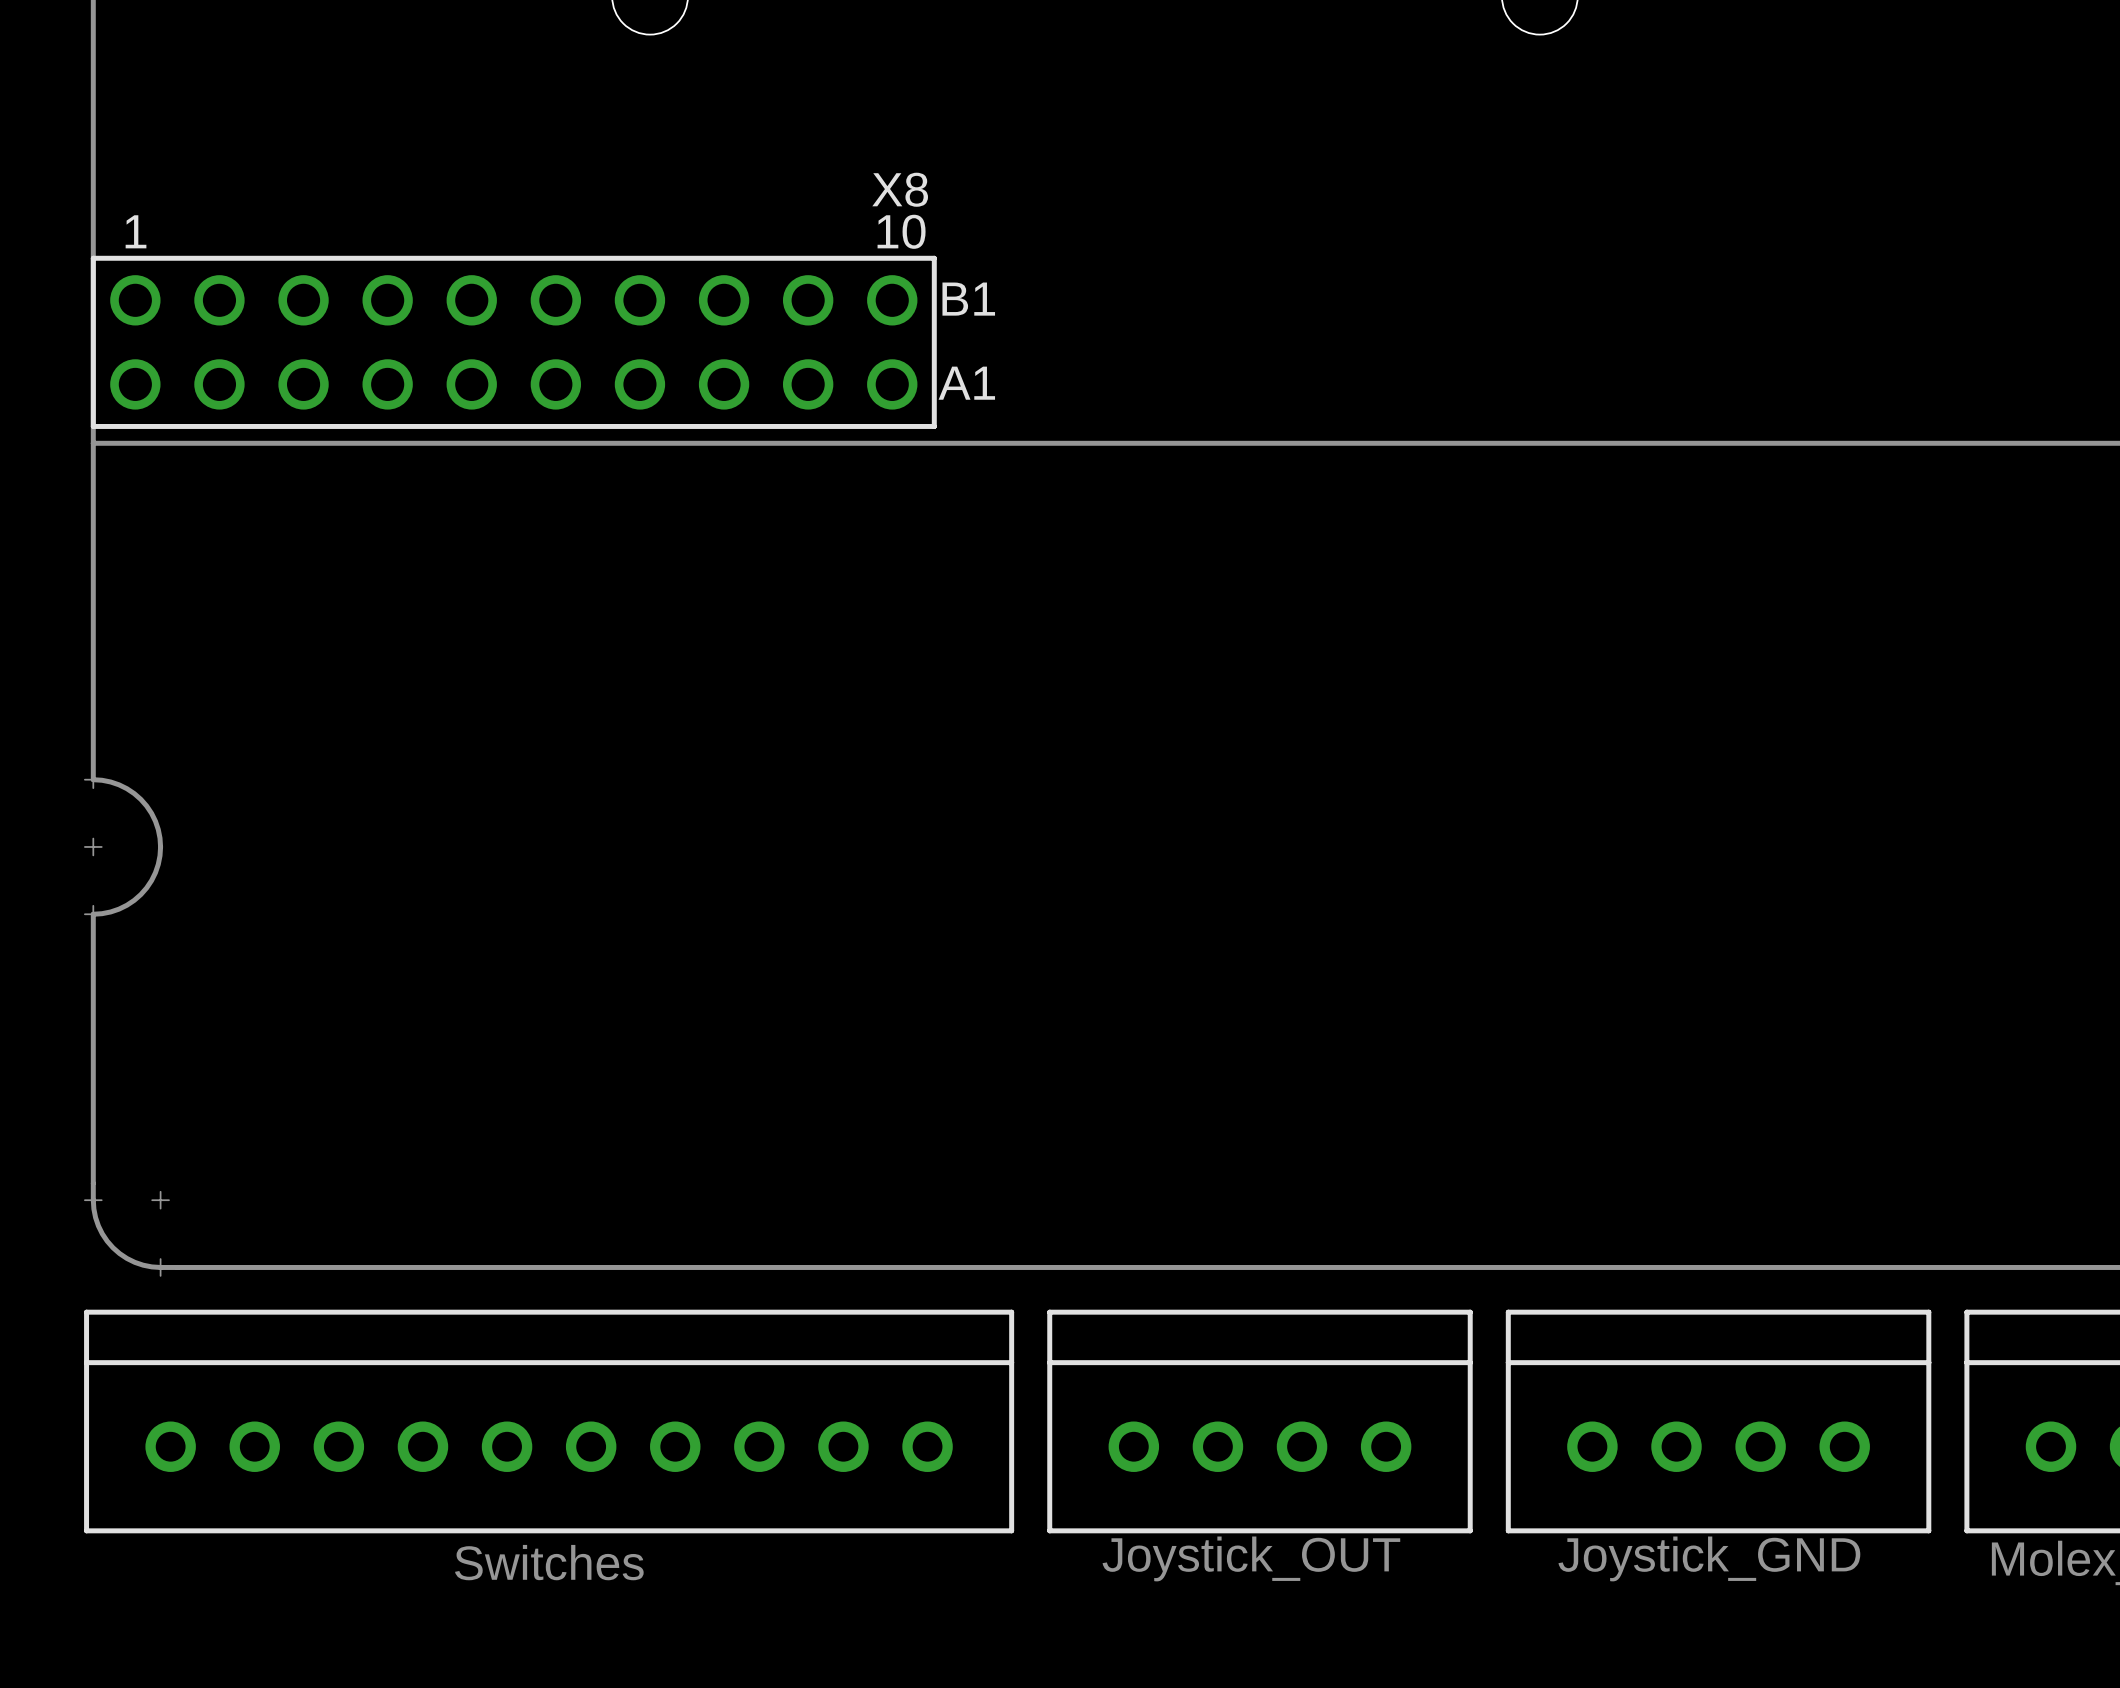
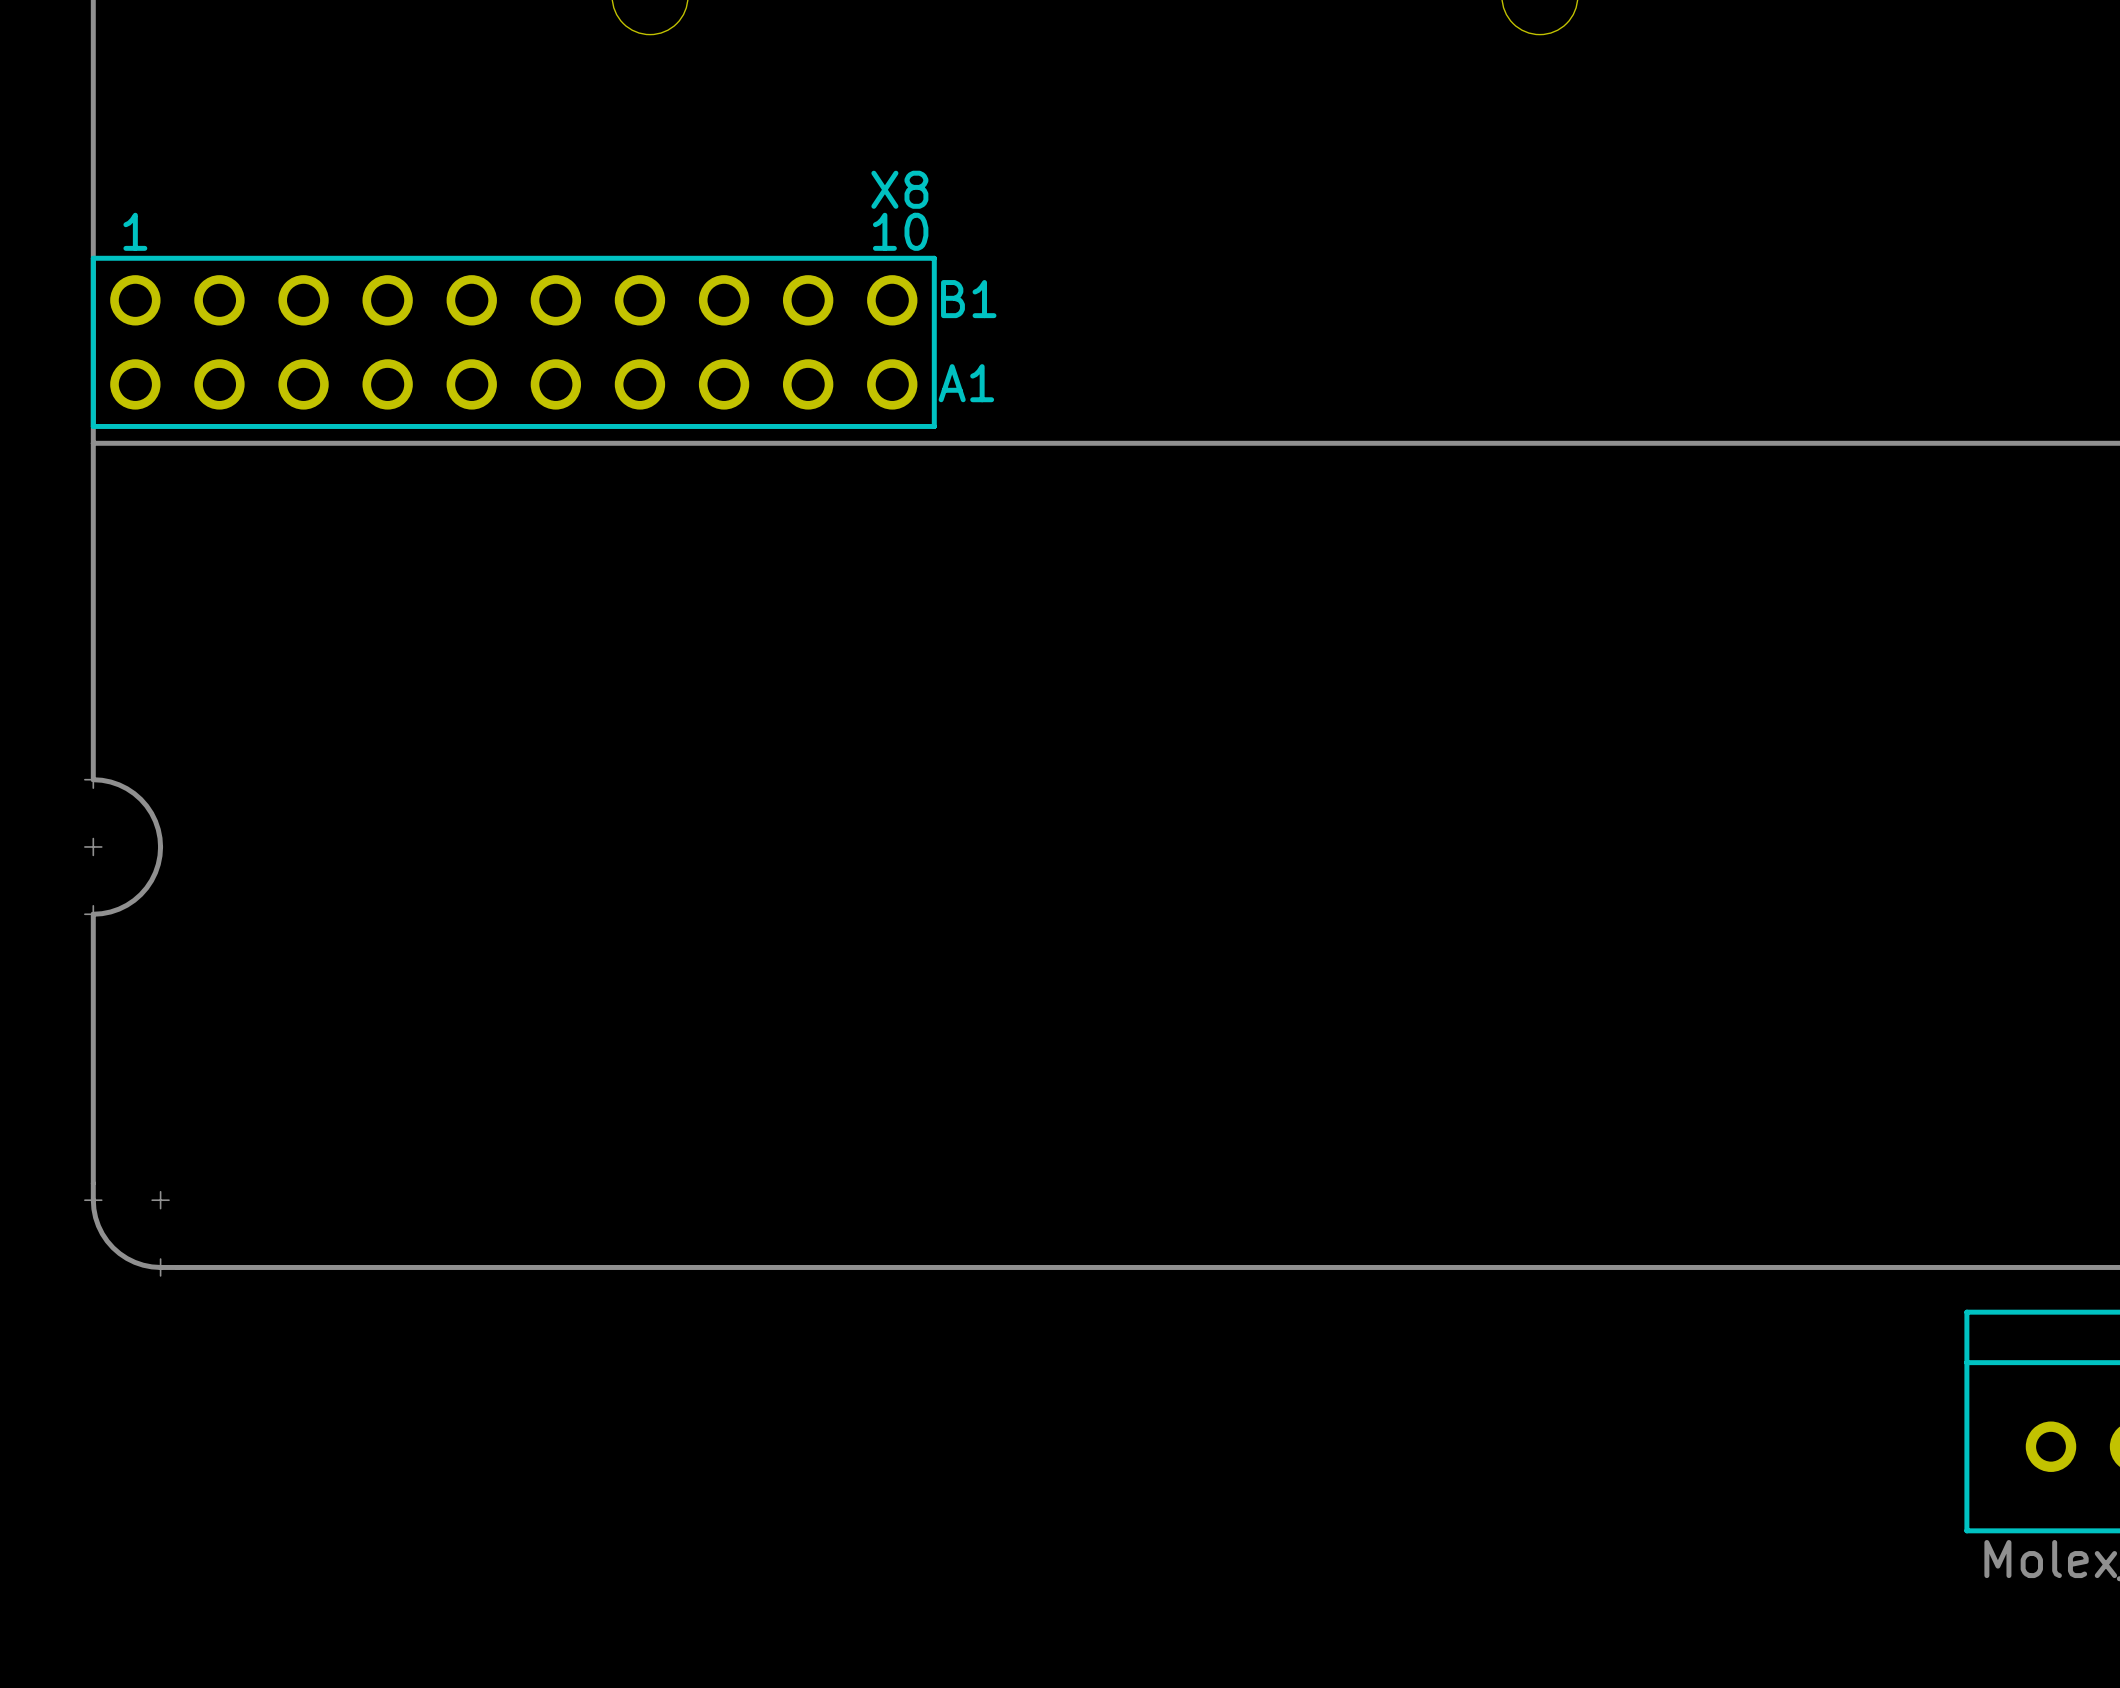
part: Switches (549, 1421) -> none
part: Joystick_OUT (1259, 1421) -> none
part: Joystick_GND (1718, 1421) -> none

